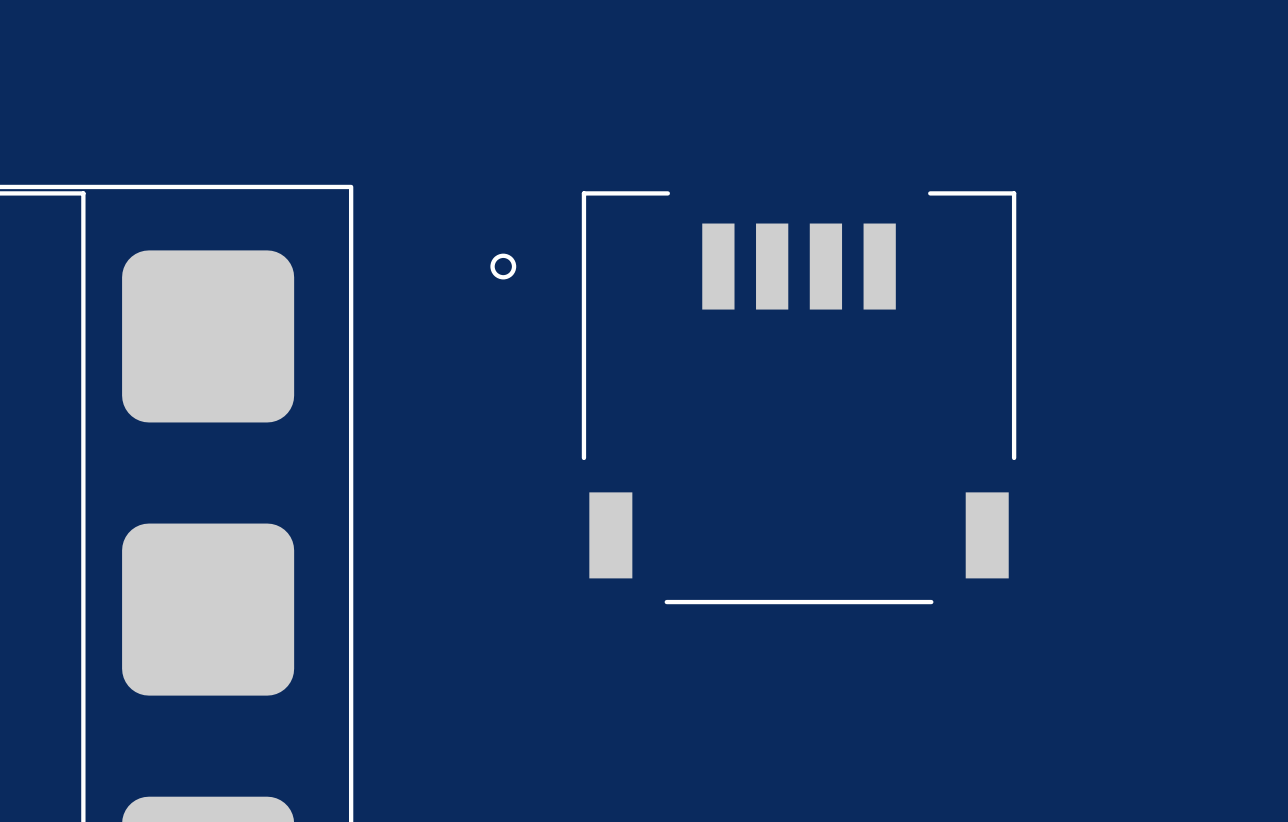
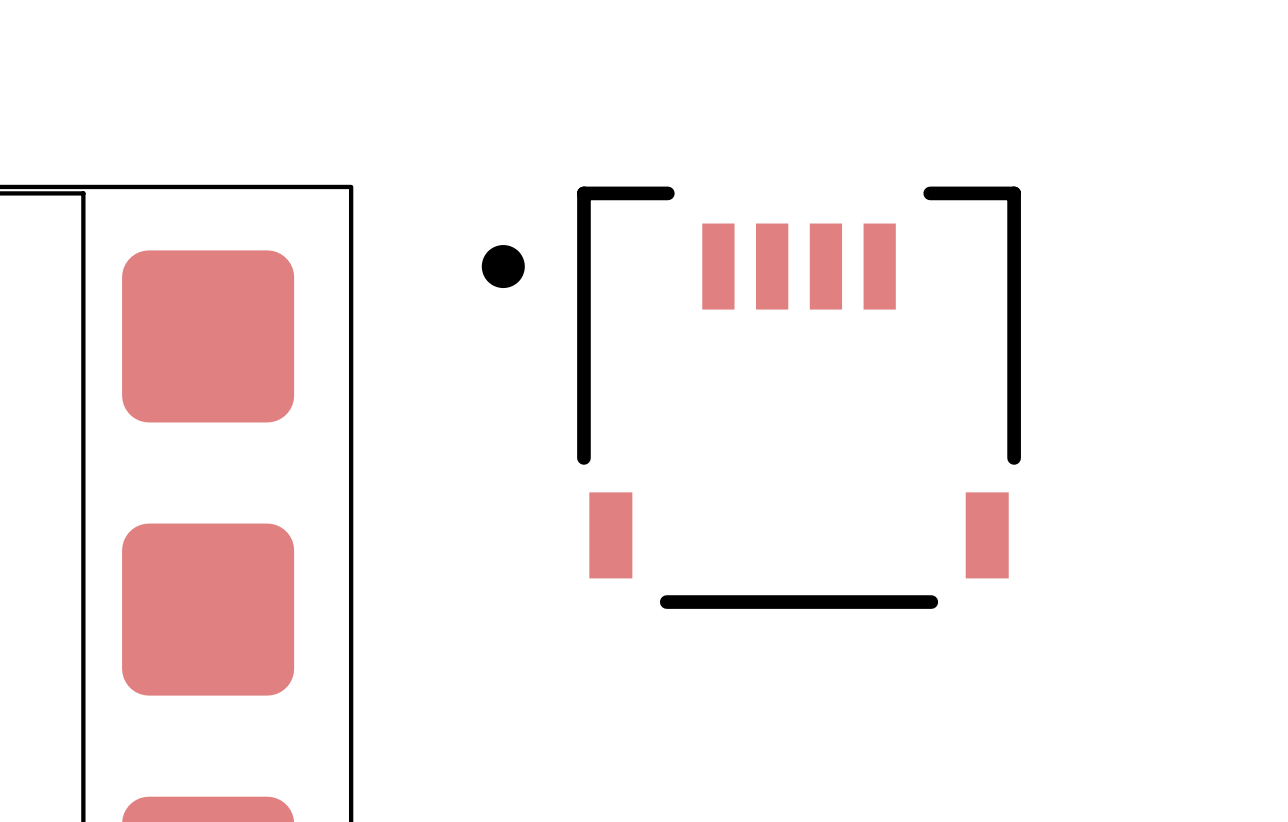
part footprint: [490, 191, 1017, 605] -> [481, 186, 1021, 609]

